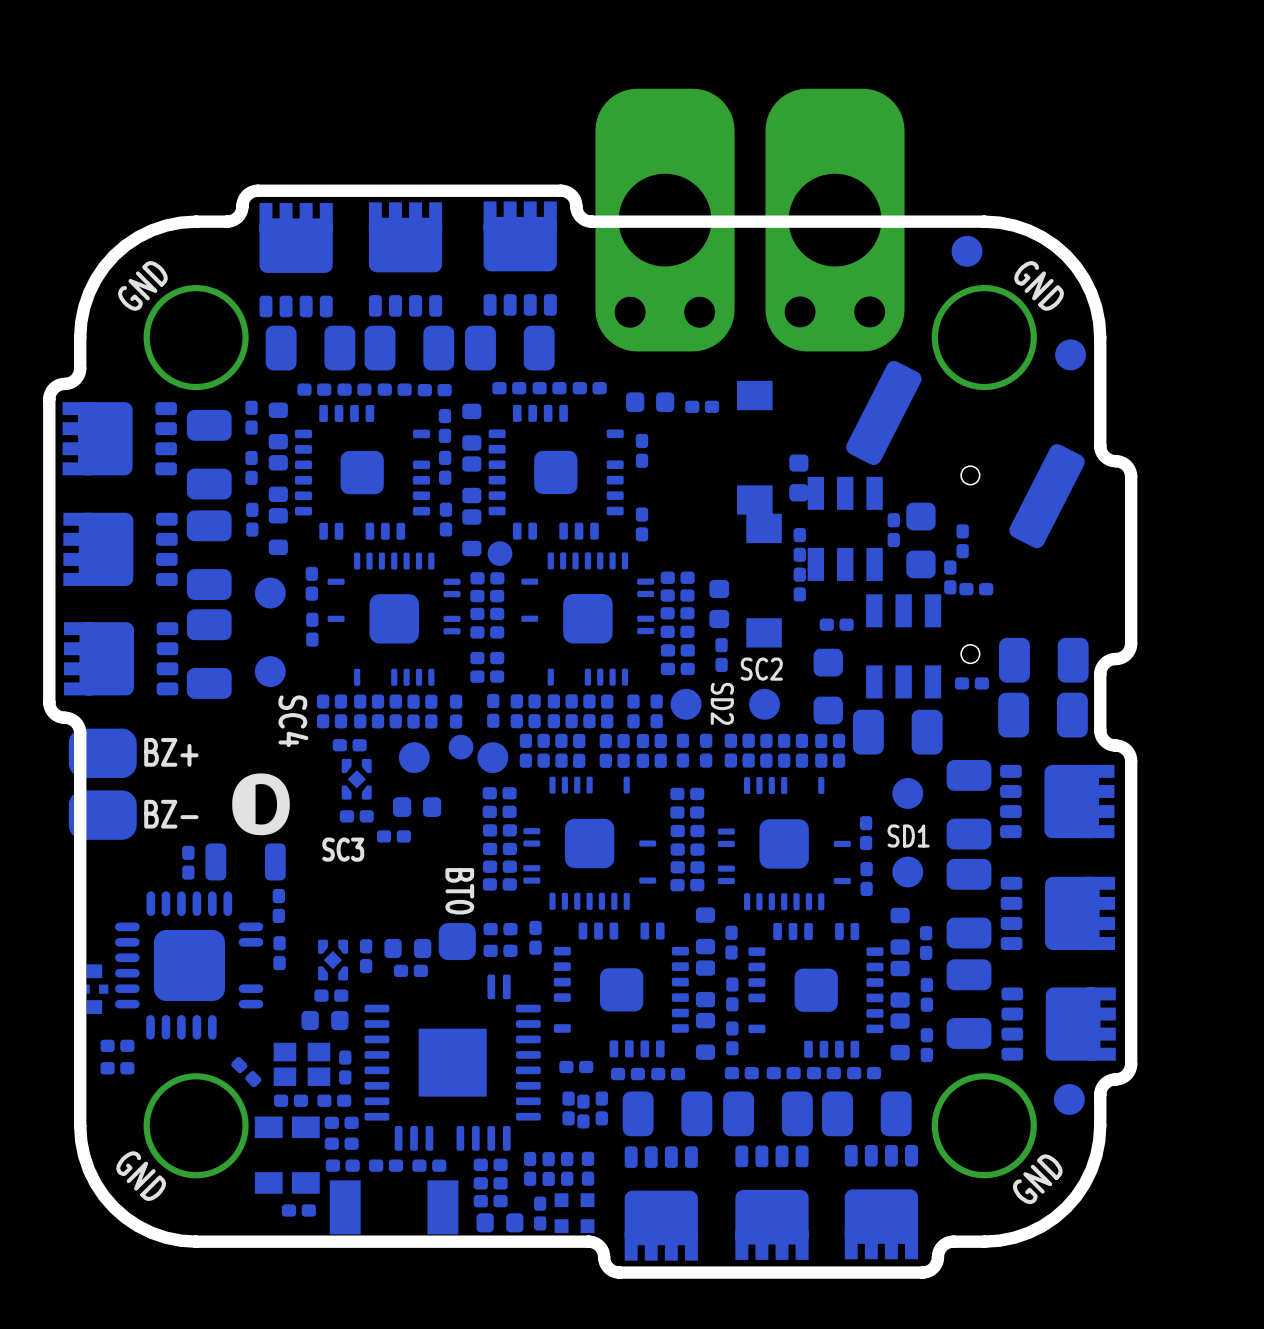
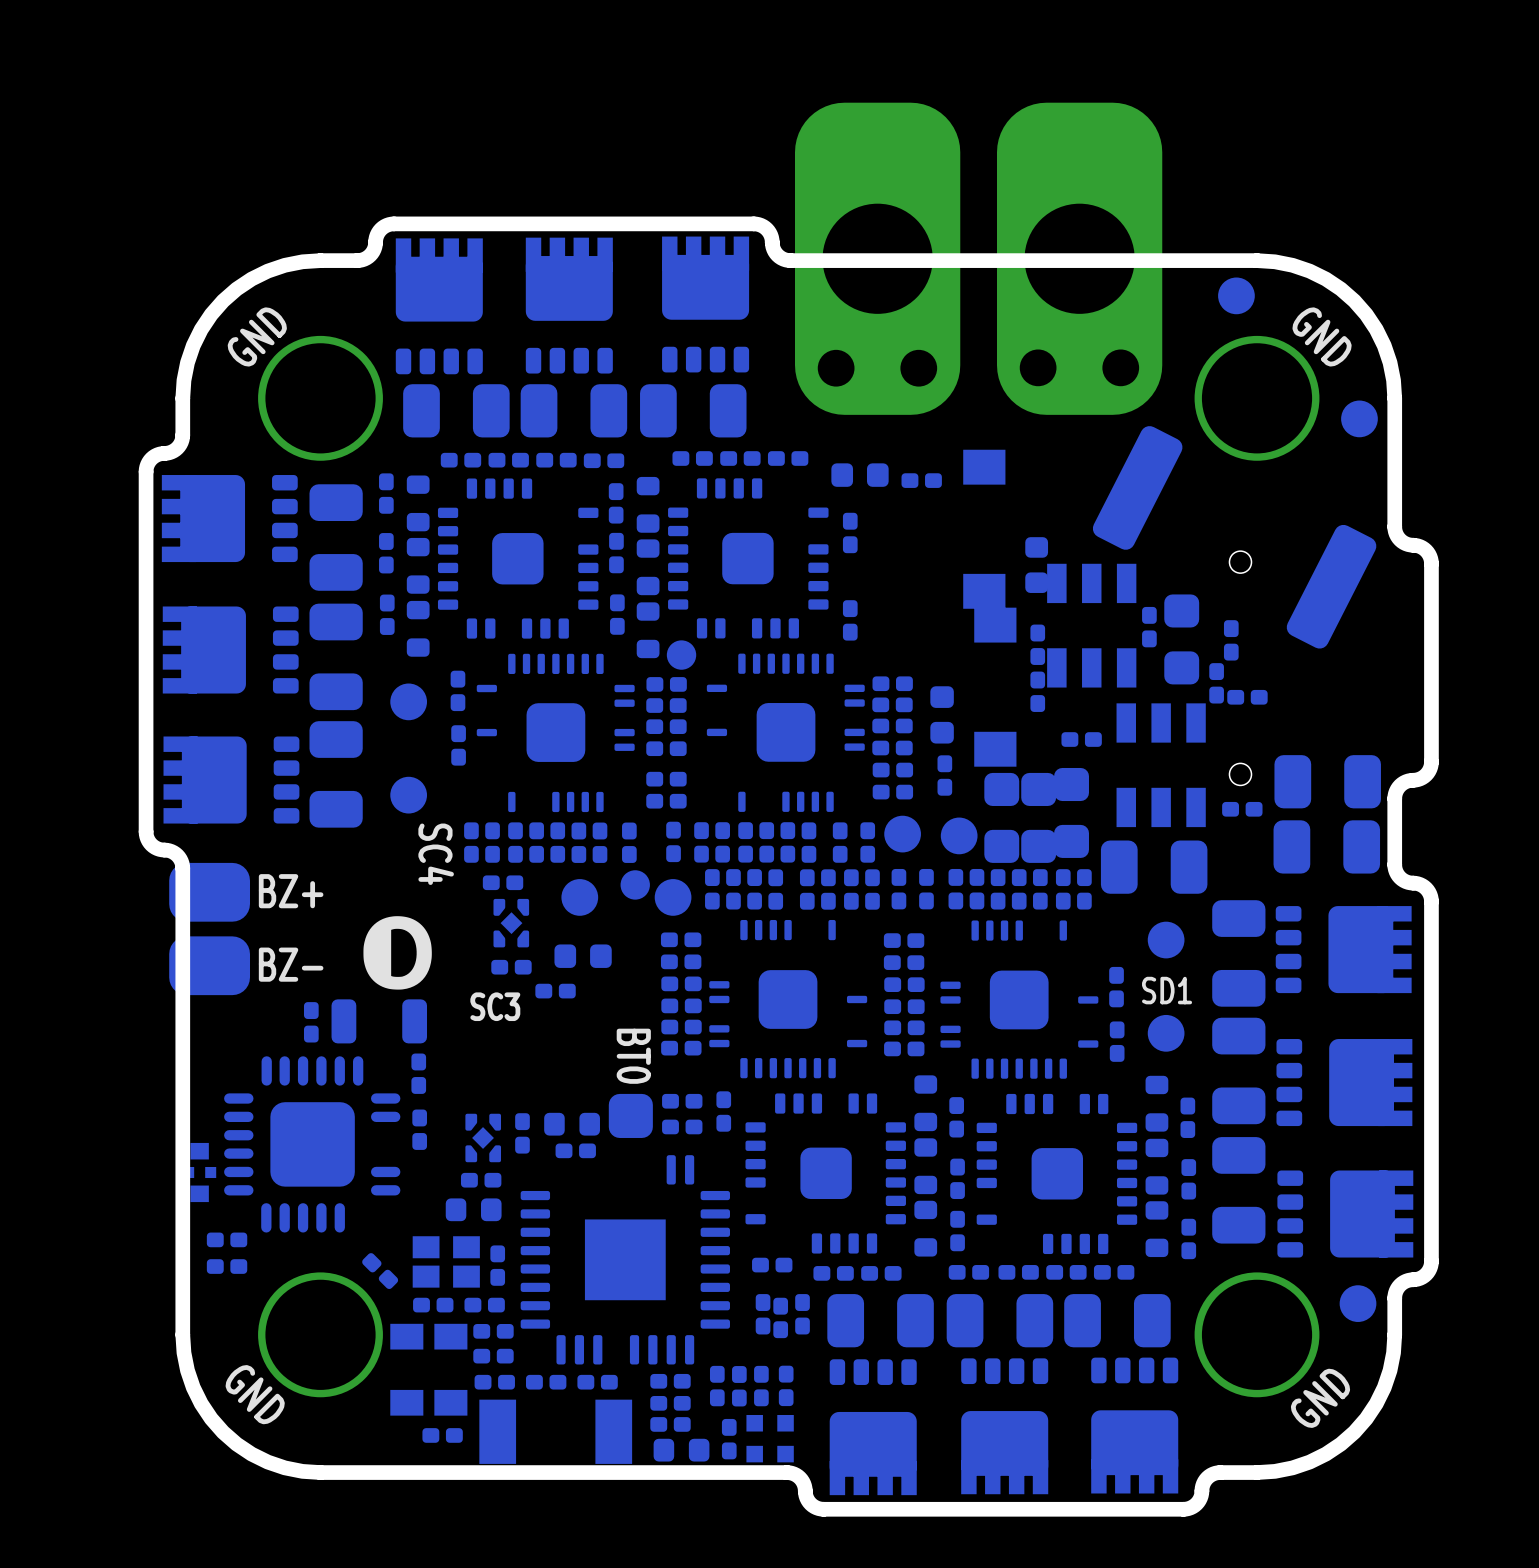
text: SC2 (761, 669) -> none
part footprint: [749, 688, 781, 720] -> [984, 772, 1020, 863]
part: none -> (1038, 817)
text: SD2 (722, 703) -> none
part: none -> (959, 835)

